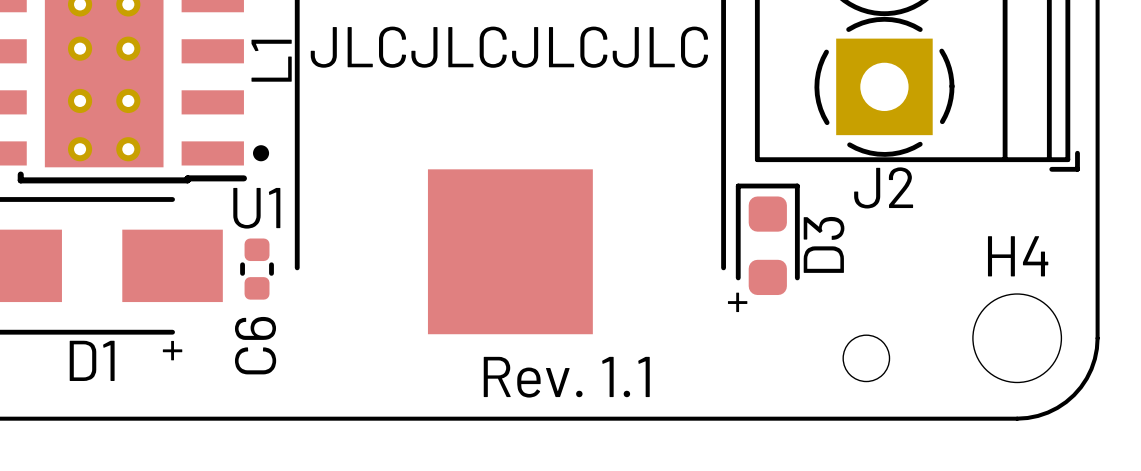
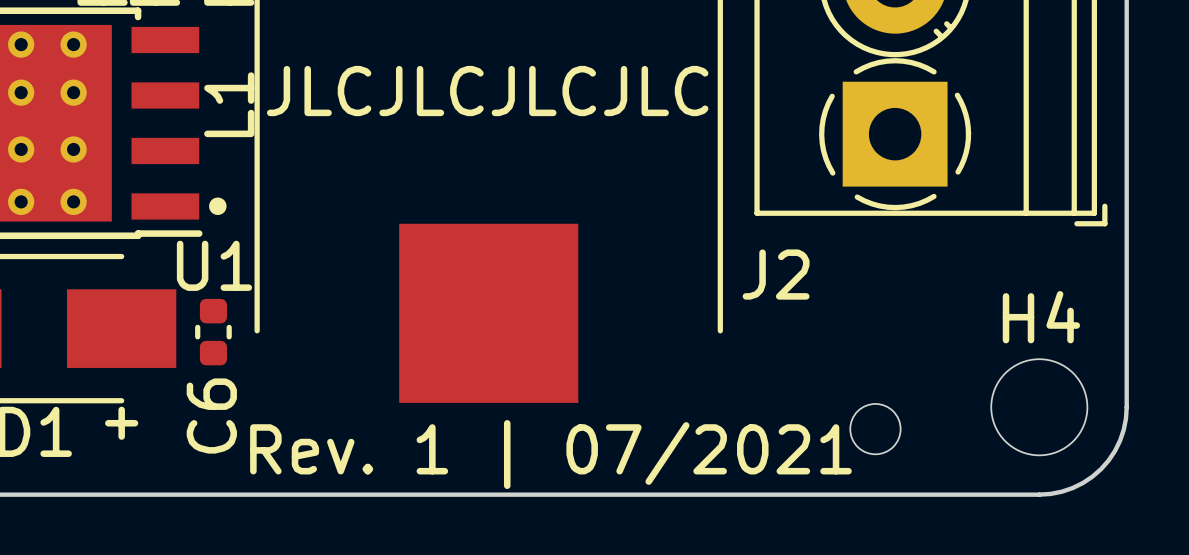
J2 name position: J2 (883, 187) -> J2 (776, 274)
D3: (767, 239) -> none
text: + (737, 302) -> none
text: Rev. 1.1 (566, 377) -> Rev. 1 | 07/2021 (550, 454)

